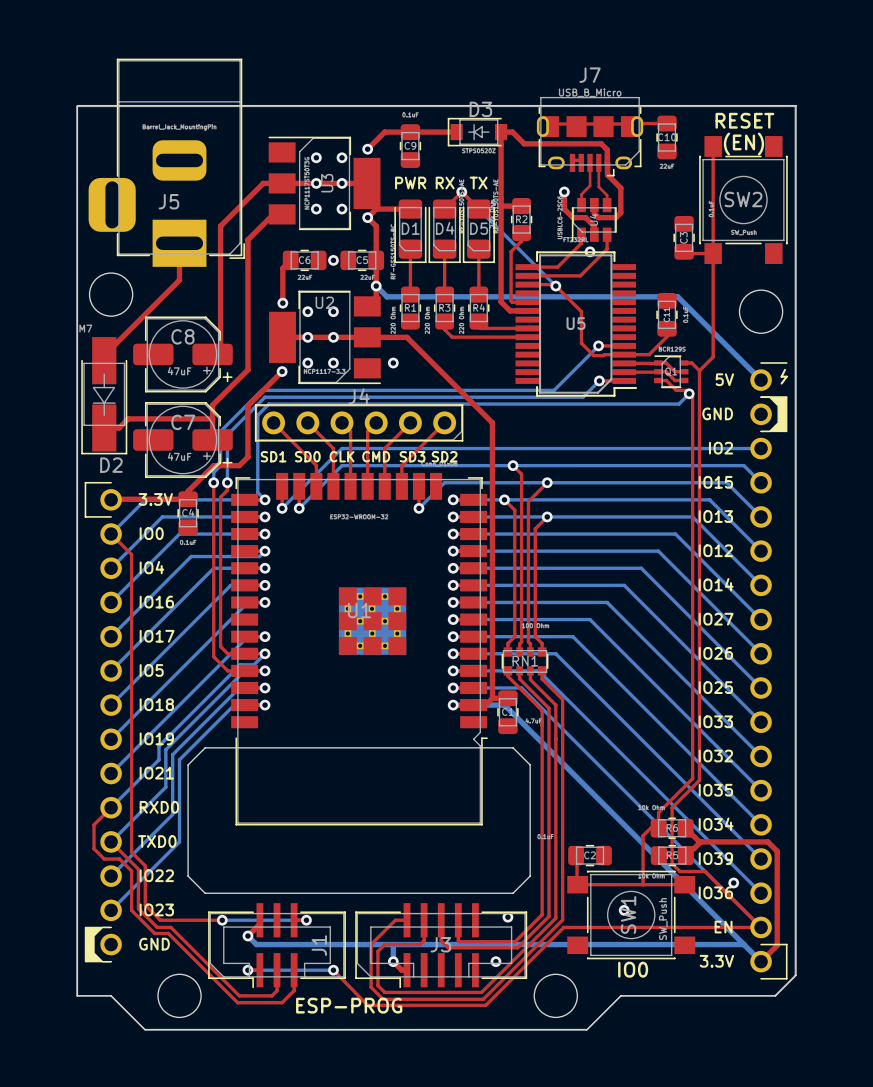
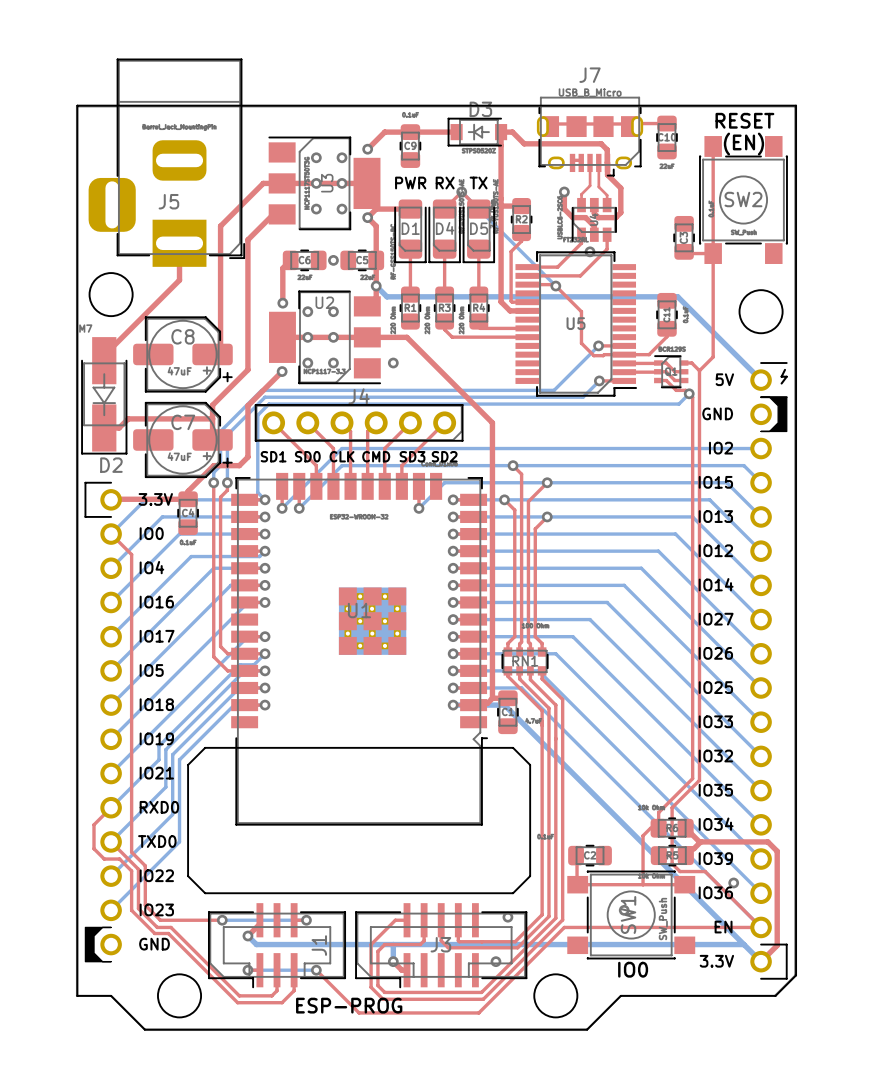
top track: (564, 927) (485, 1005) (367, 1005) (333, 970) -> (564, 927) (478, 1012) (359, 1012) (316, 970)
bottom track: (316, 970) (333, 970) -> none
via position: (333, 970) -> (316, 970)

